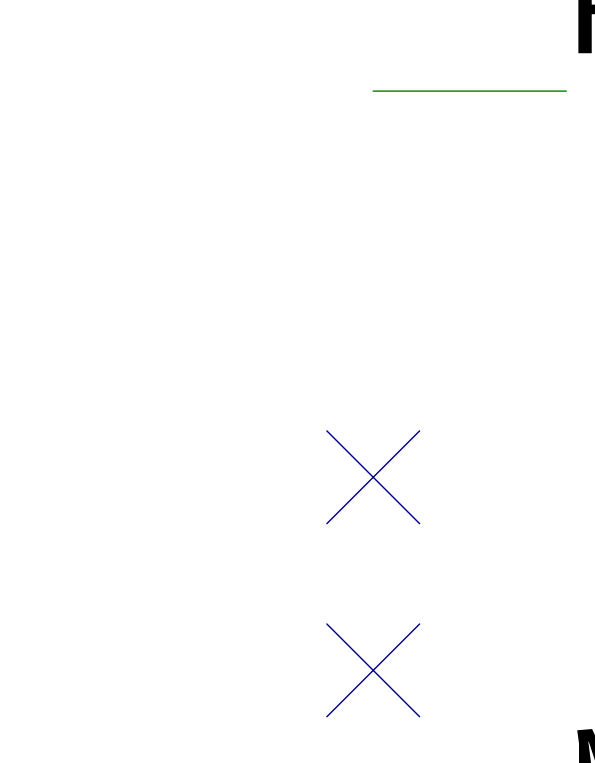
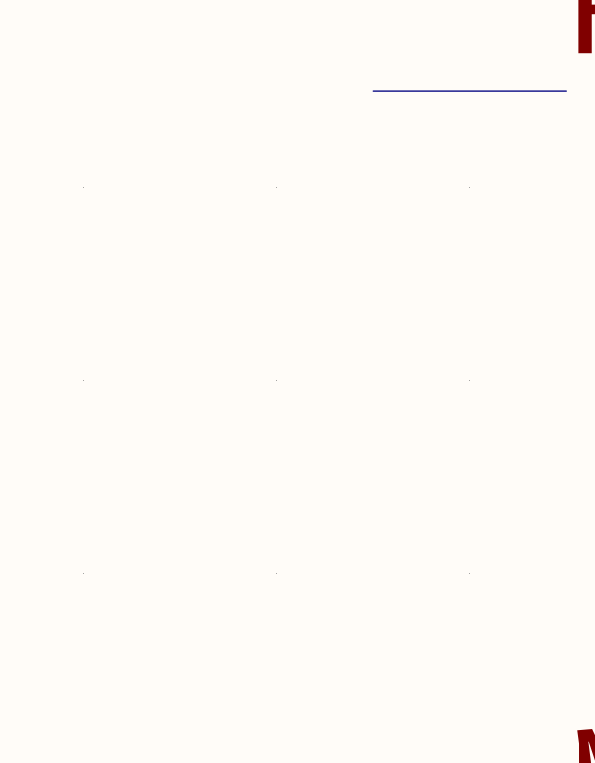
no-connect mark: (373, 477) -> none
no-connect mark: (373, 670) -> none

